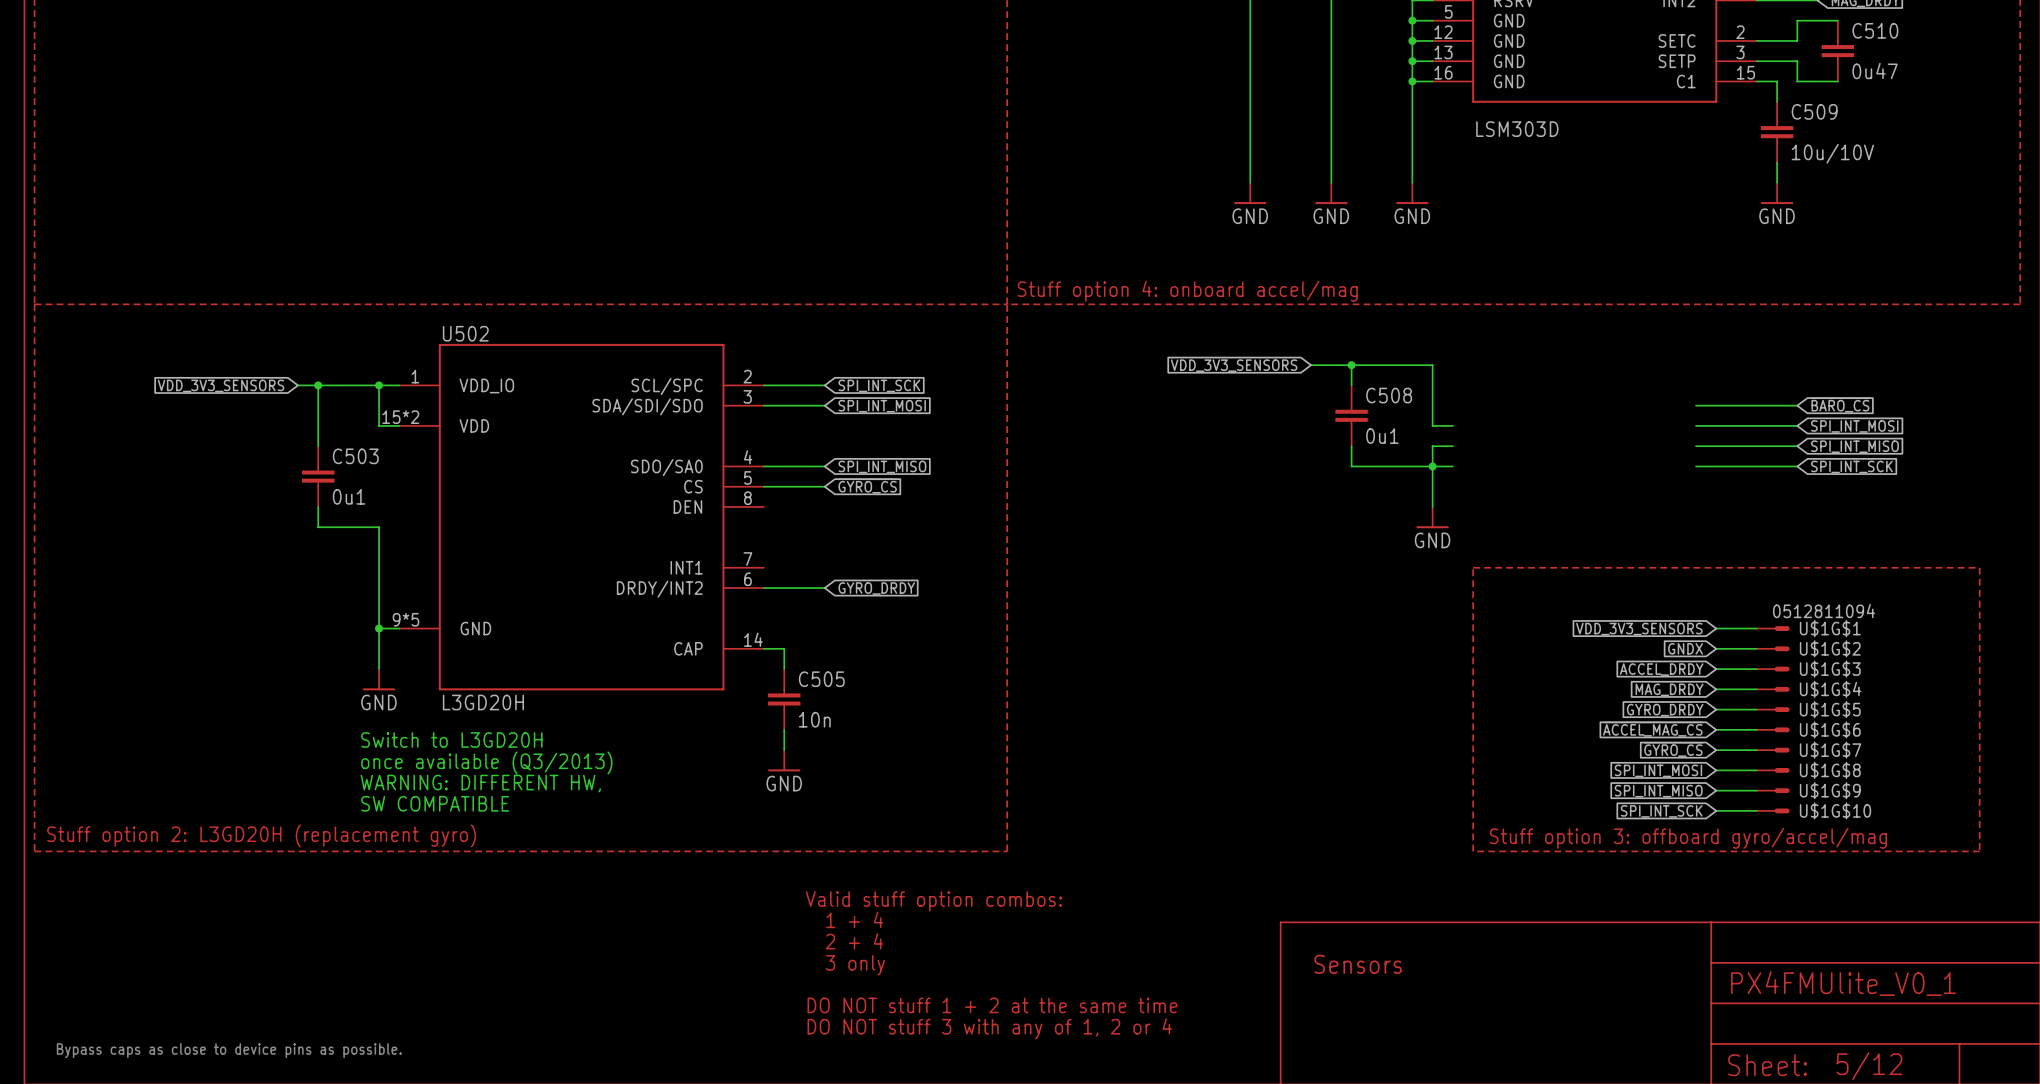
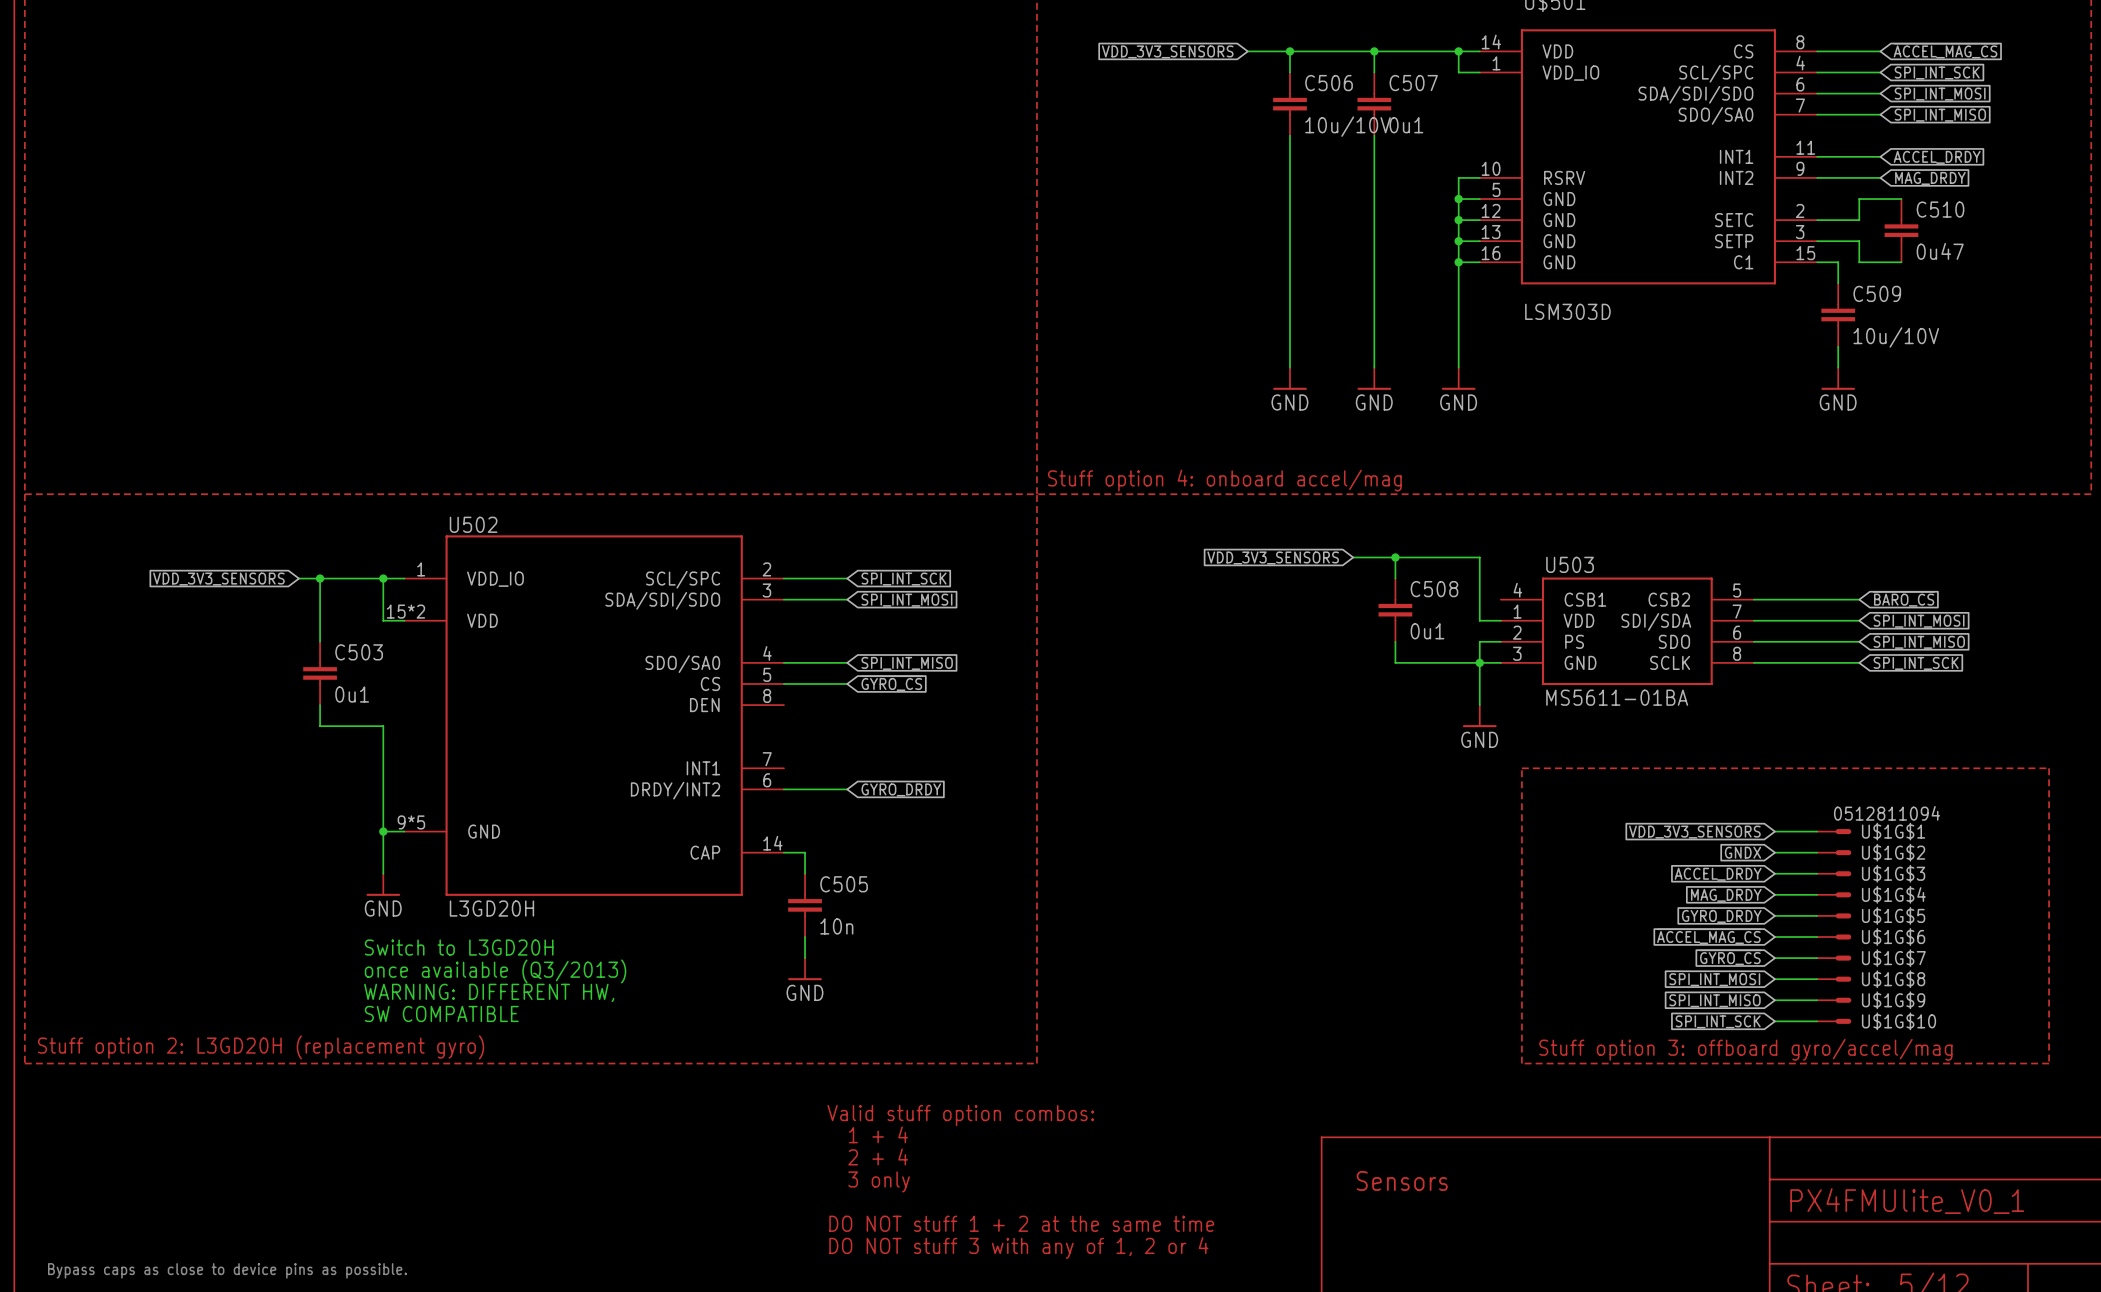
U503: none -> MS5611-01BA (1627, 631)

